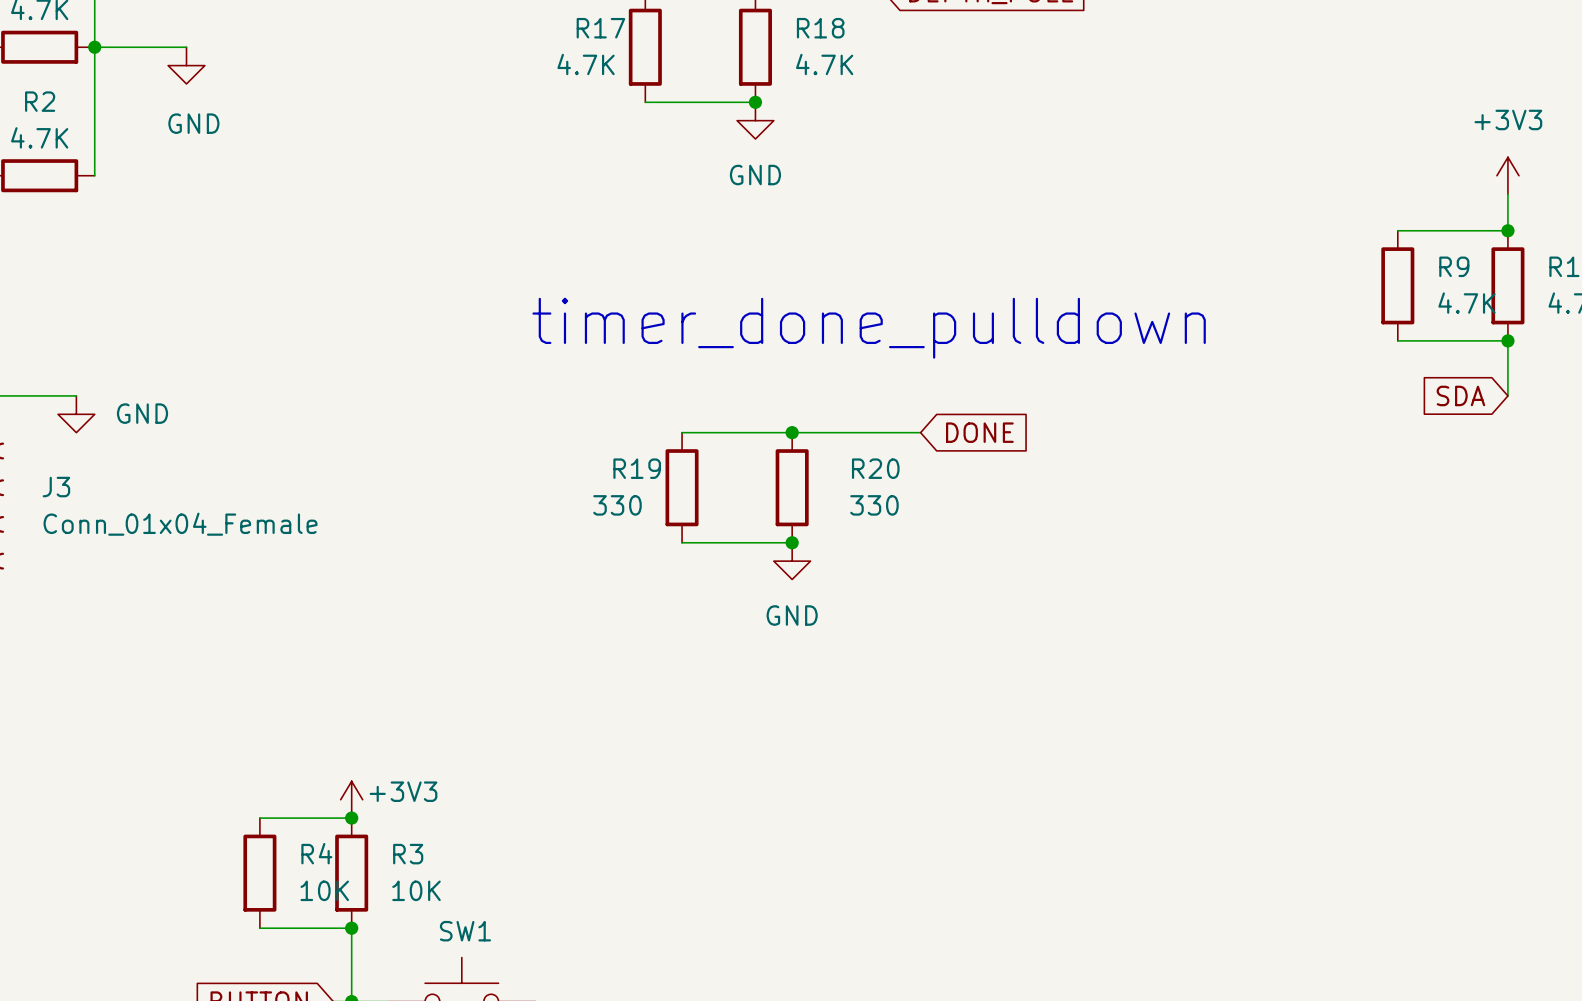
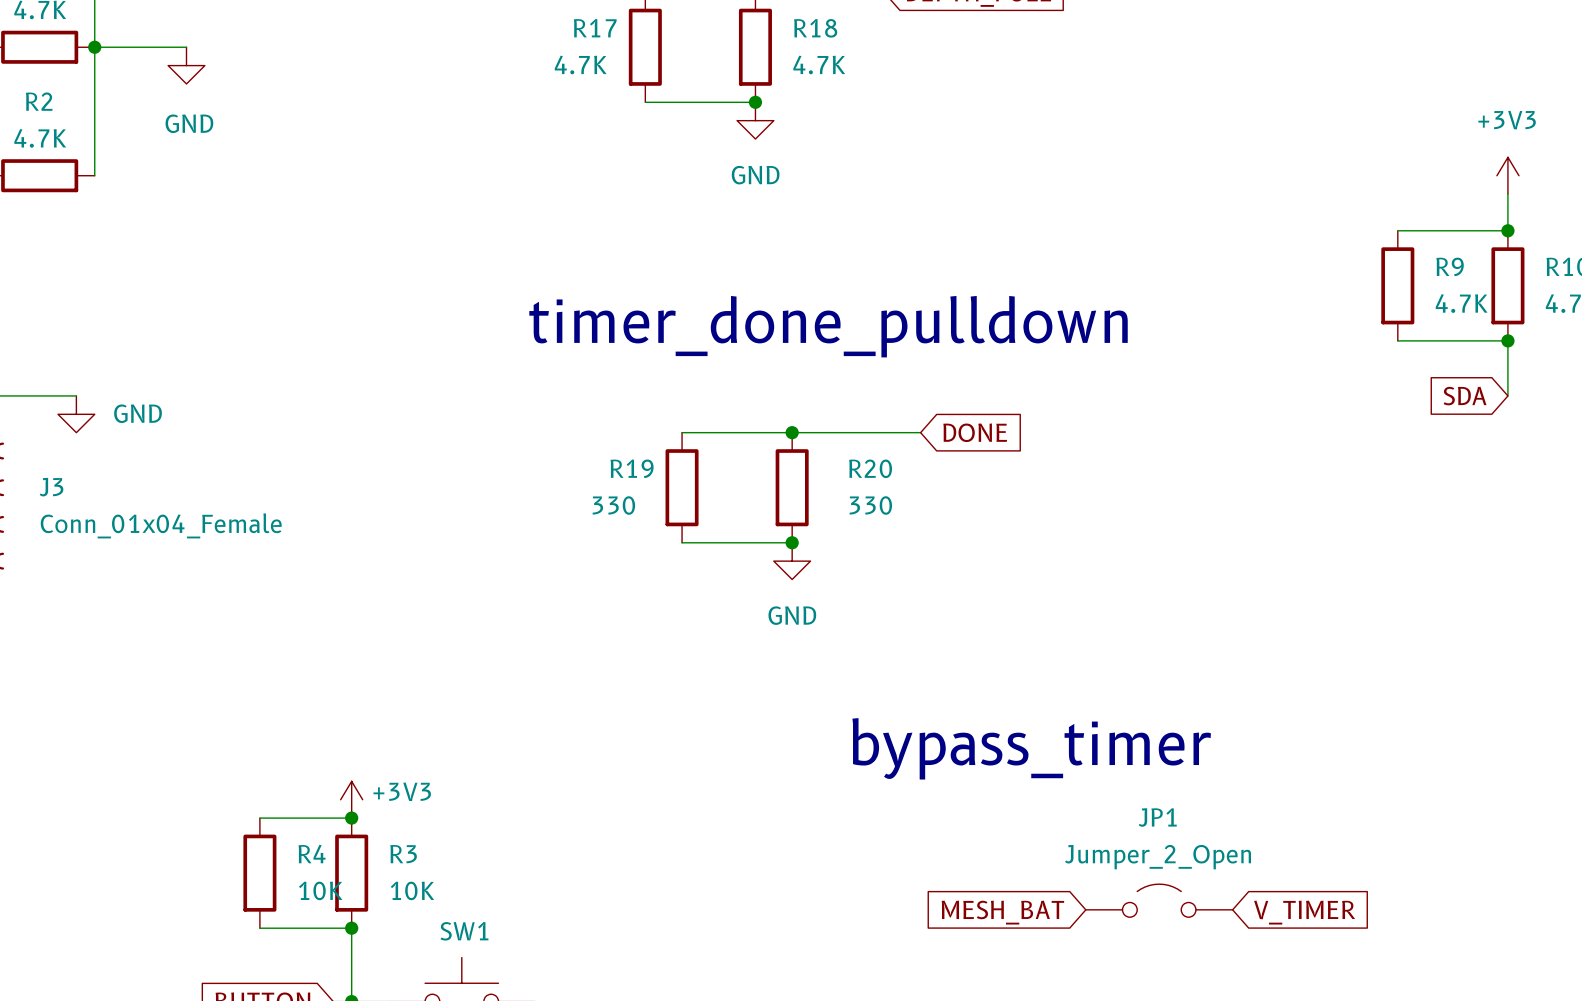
text: none -> bypass_timer (1031, 748)
JP1: none -> Jumper_2_Open (1159, 900)
global label: none -> MESH_BAT (1002, 912)
global label: none -> V_TIMER (1304, 912)

